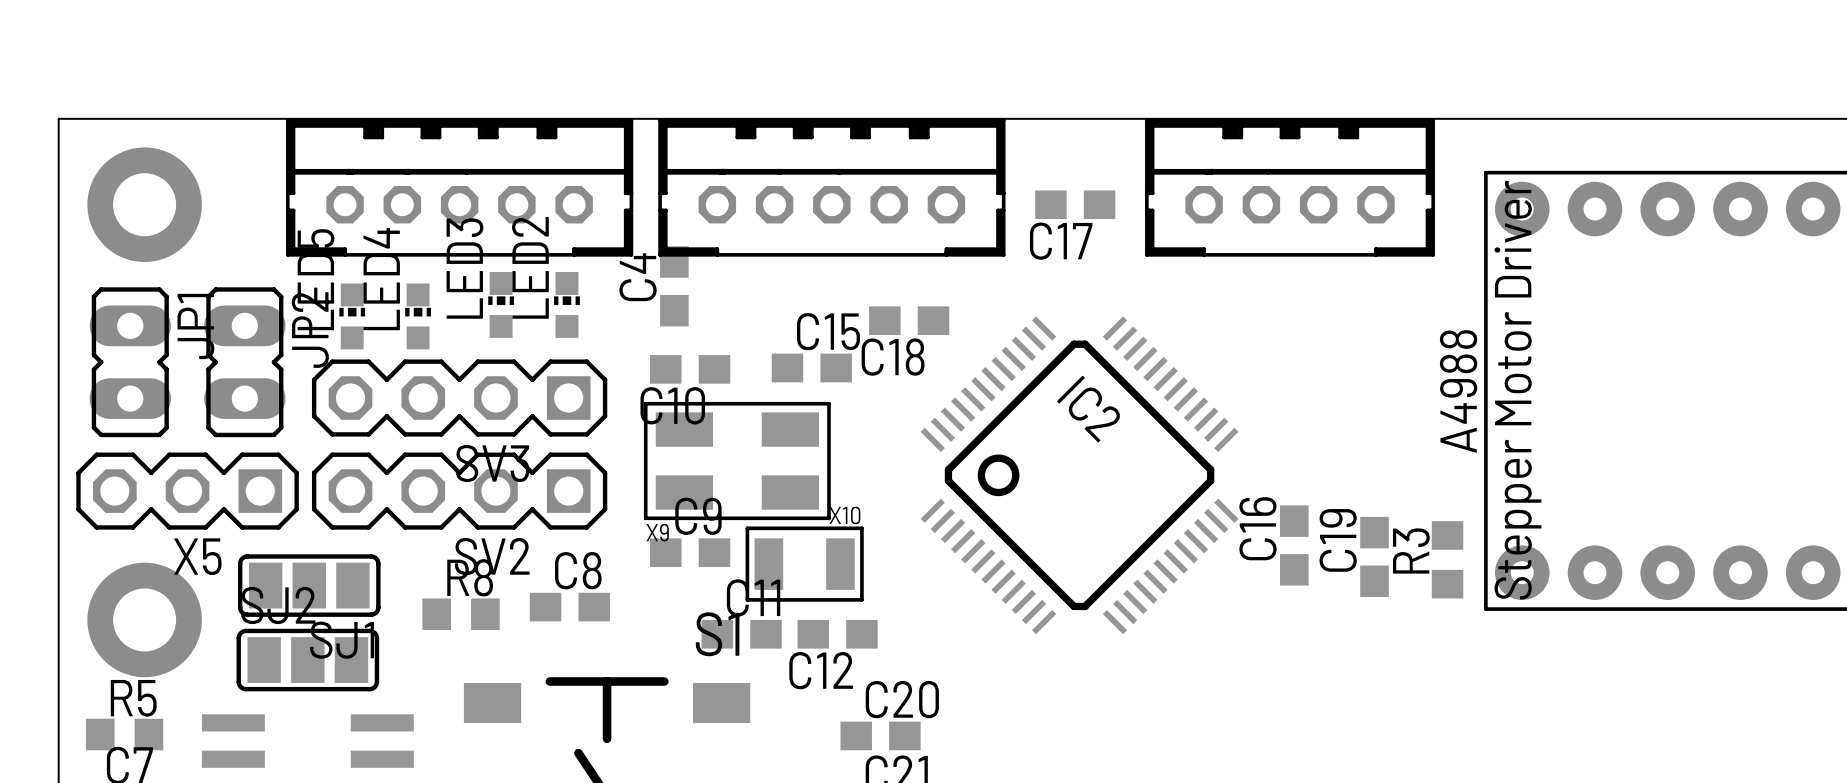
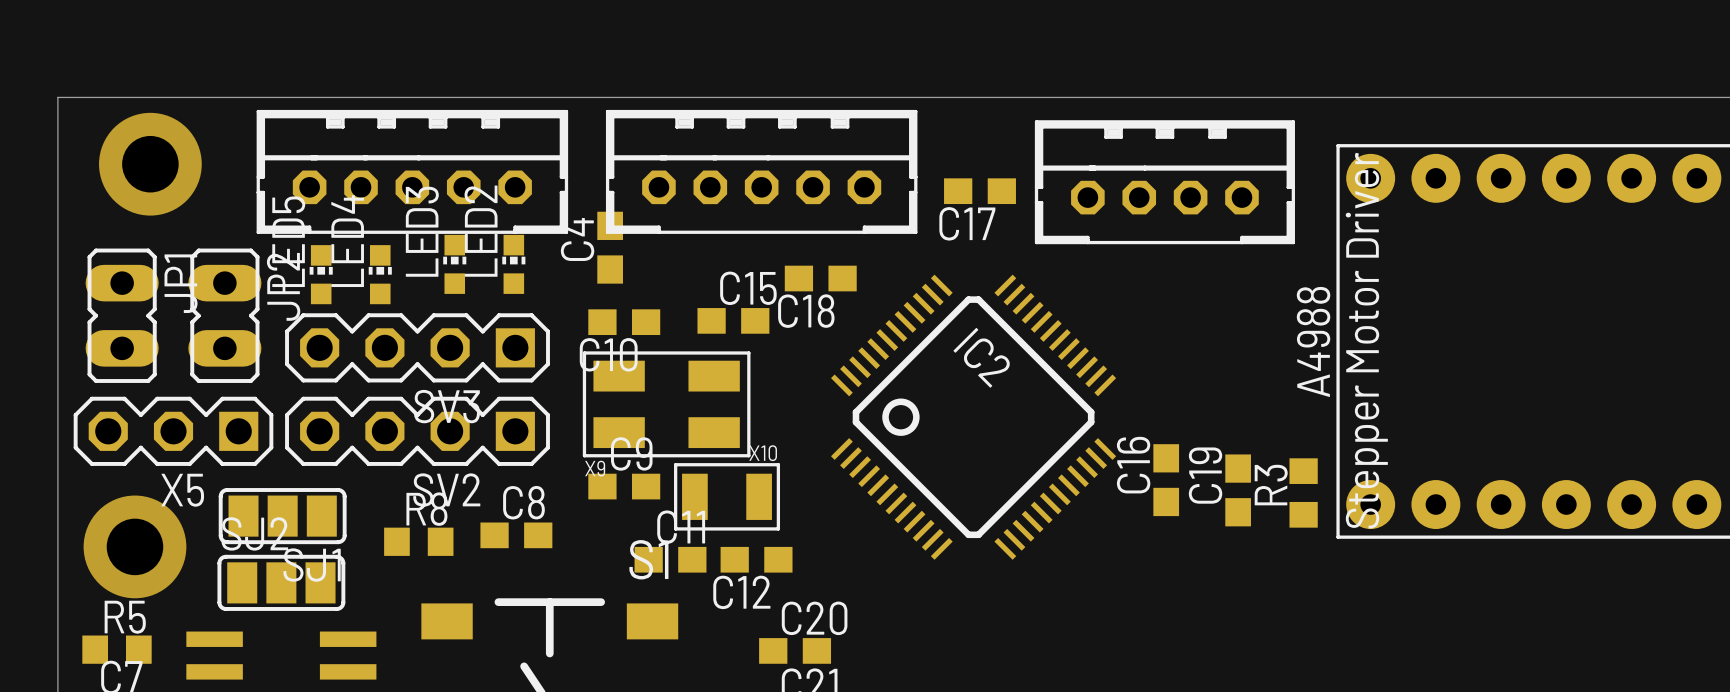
part position: (459, 187) -> (412, 171)
part position: (831, 187) -> (761, 171)
part position: (1290, 187) -> (1164, 182)
via position: (144, 204) -> (150, 164)
C17 position: (1075, 204) -> (980, 191)

